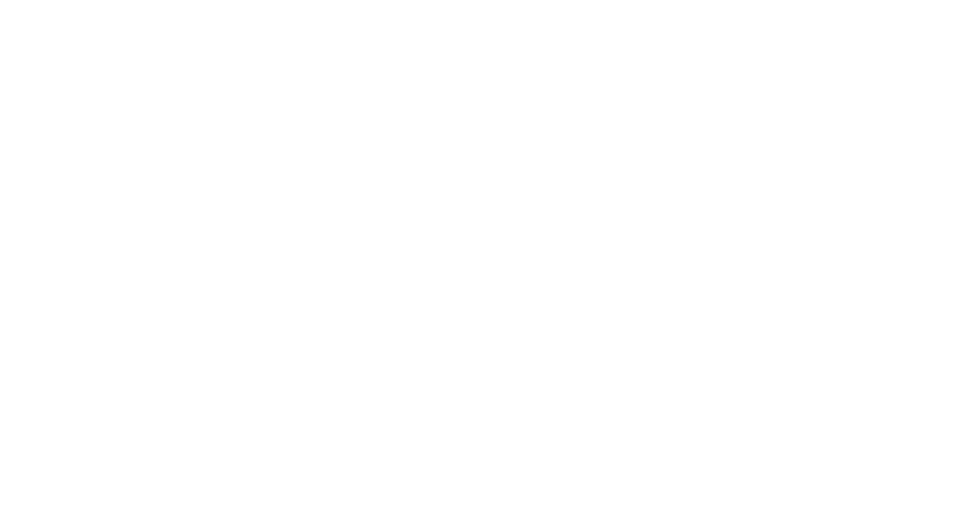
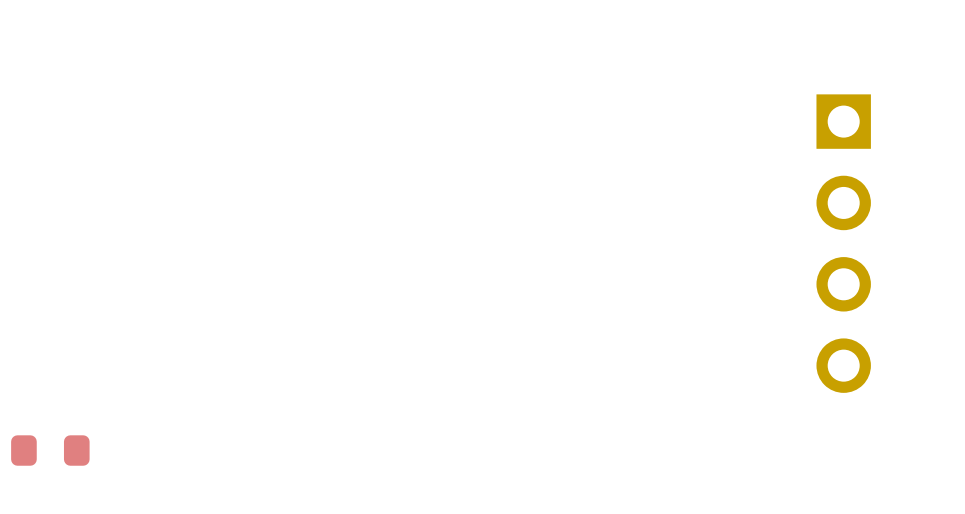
part: none -> (843, 243)
part: none -> (50, 450)

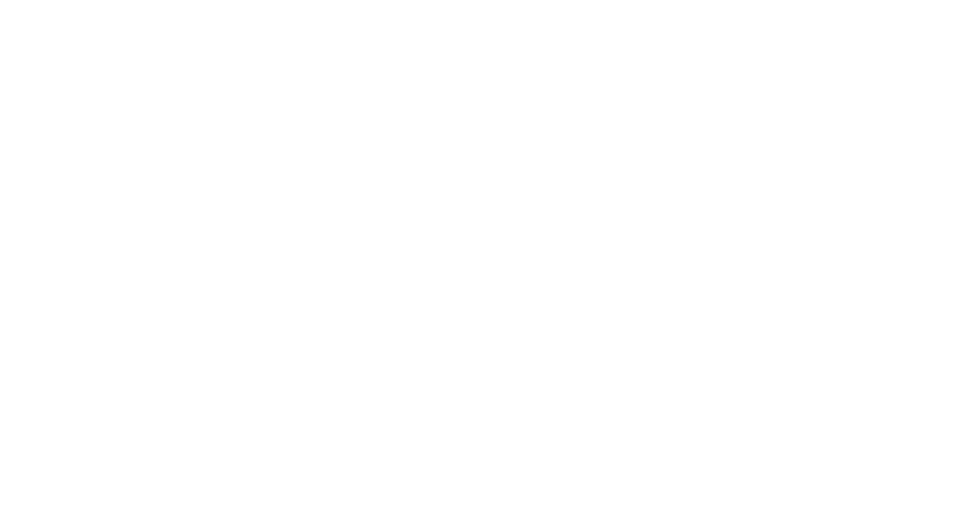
part: (843, 243) -> none
part: (50, 450) -> none

